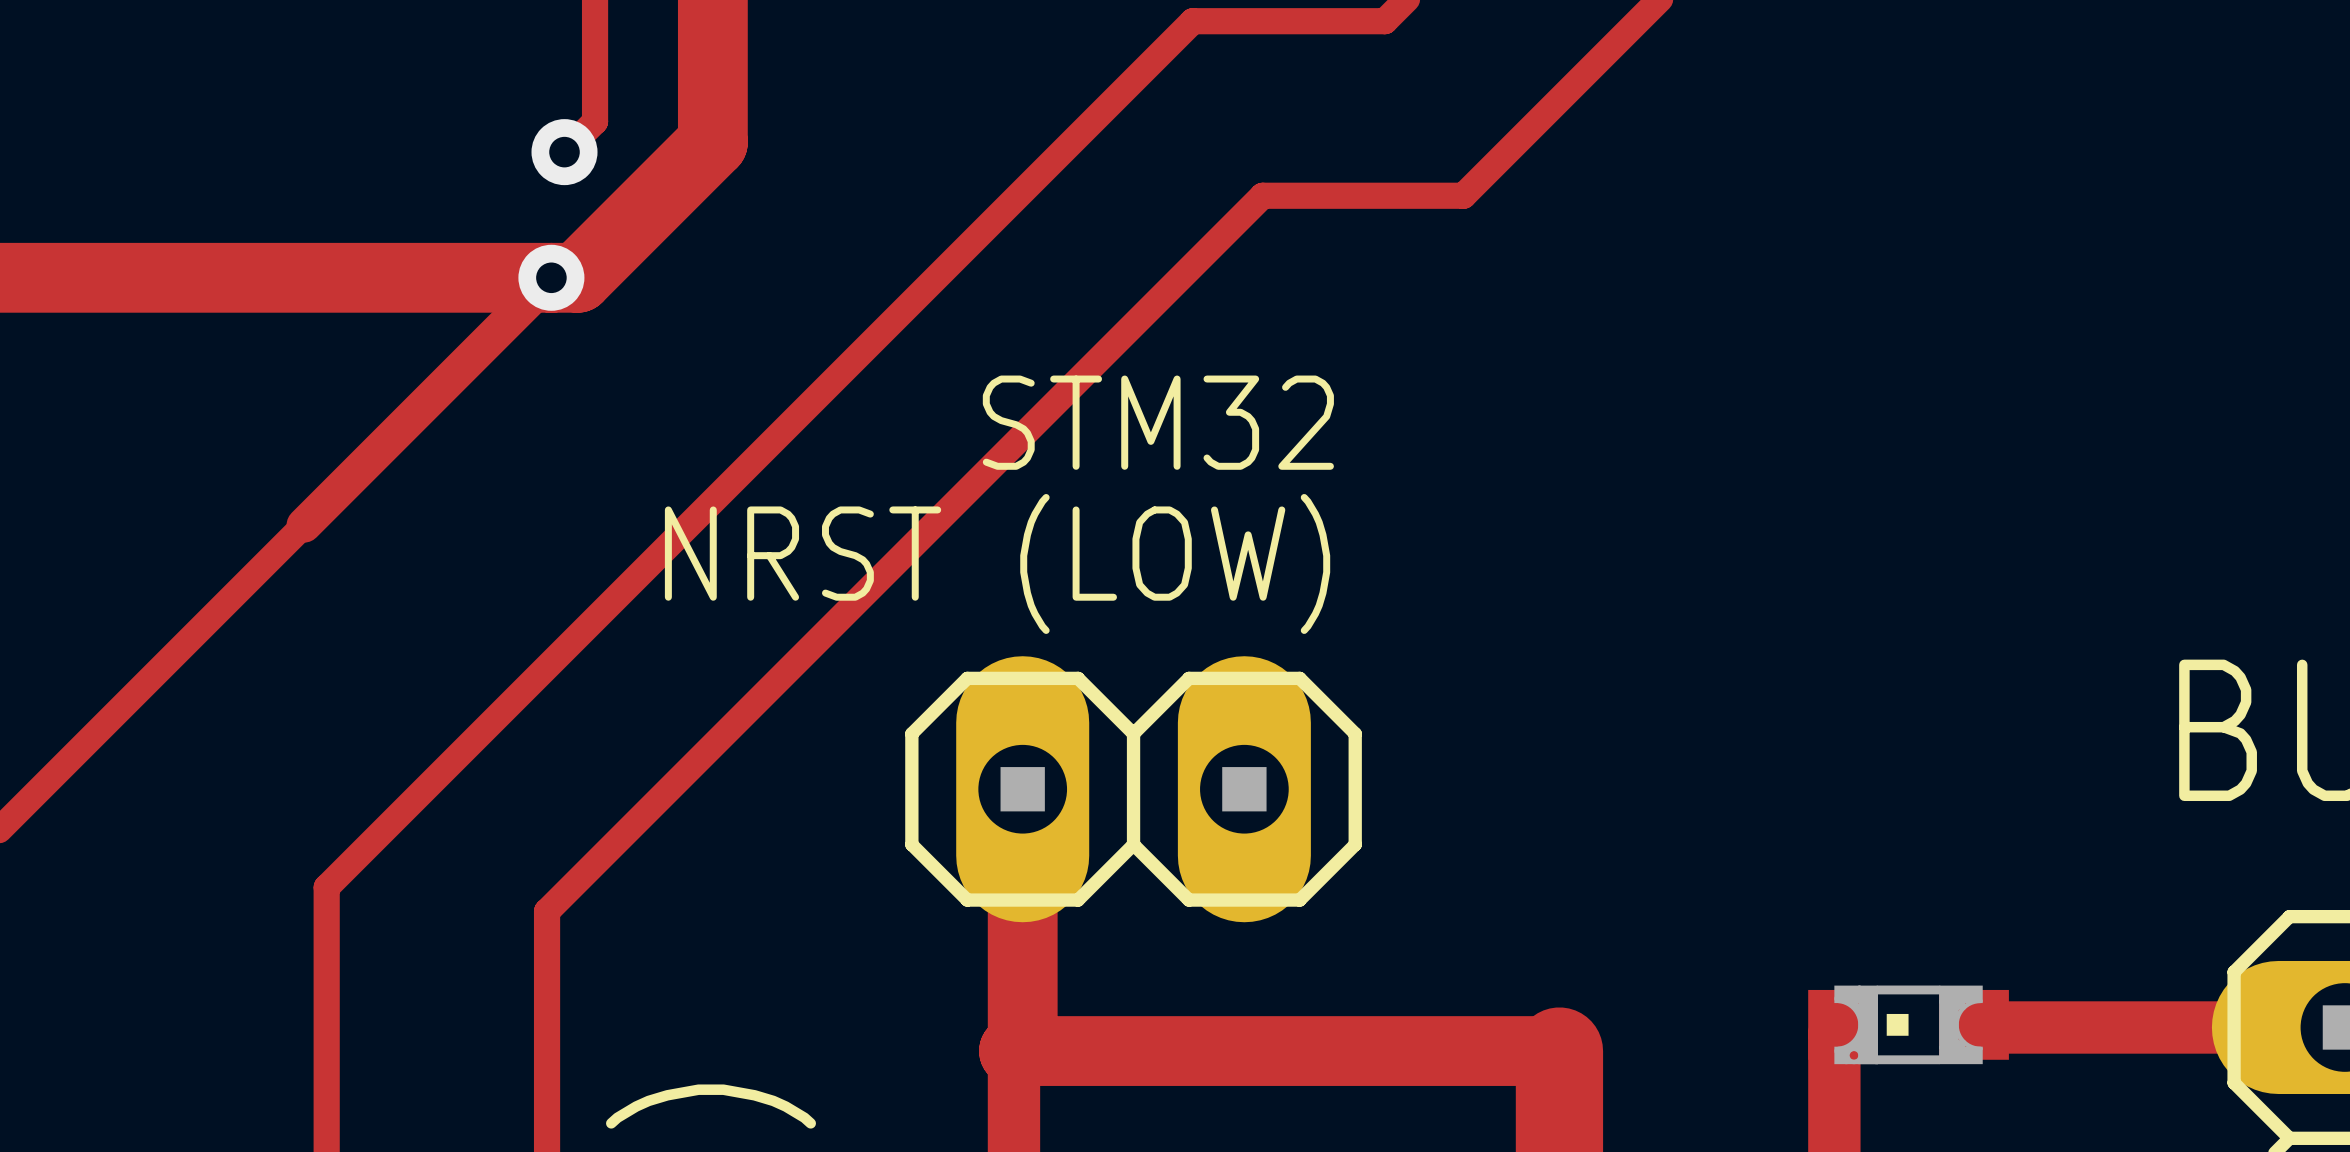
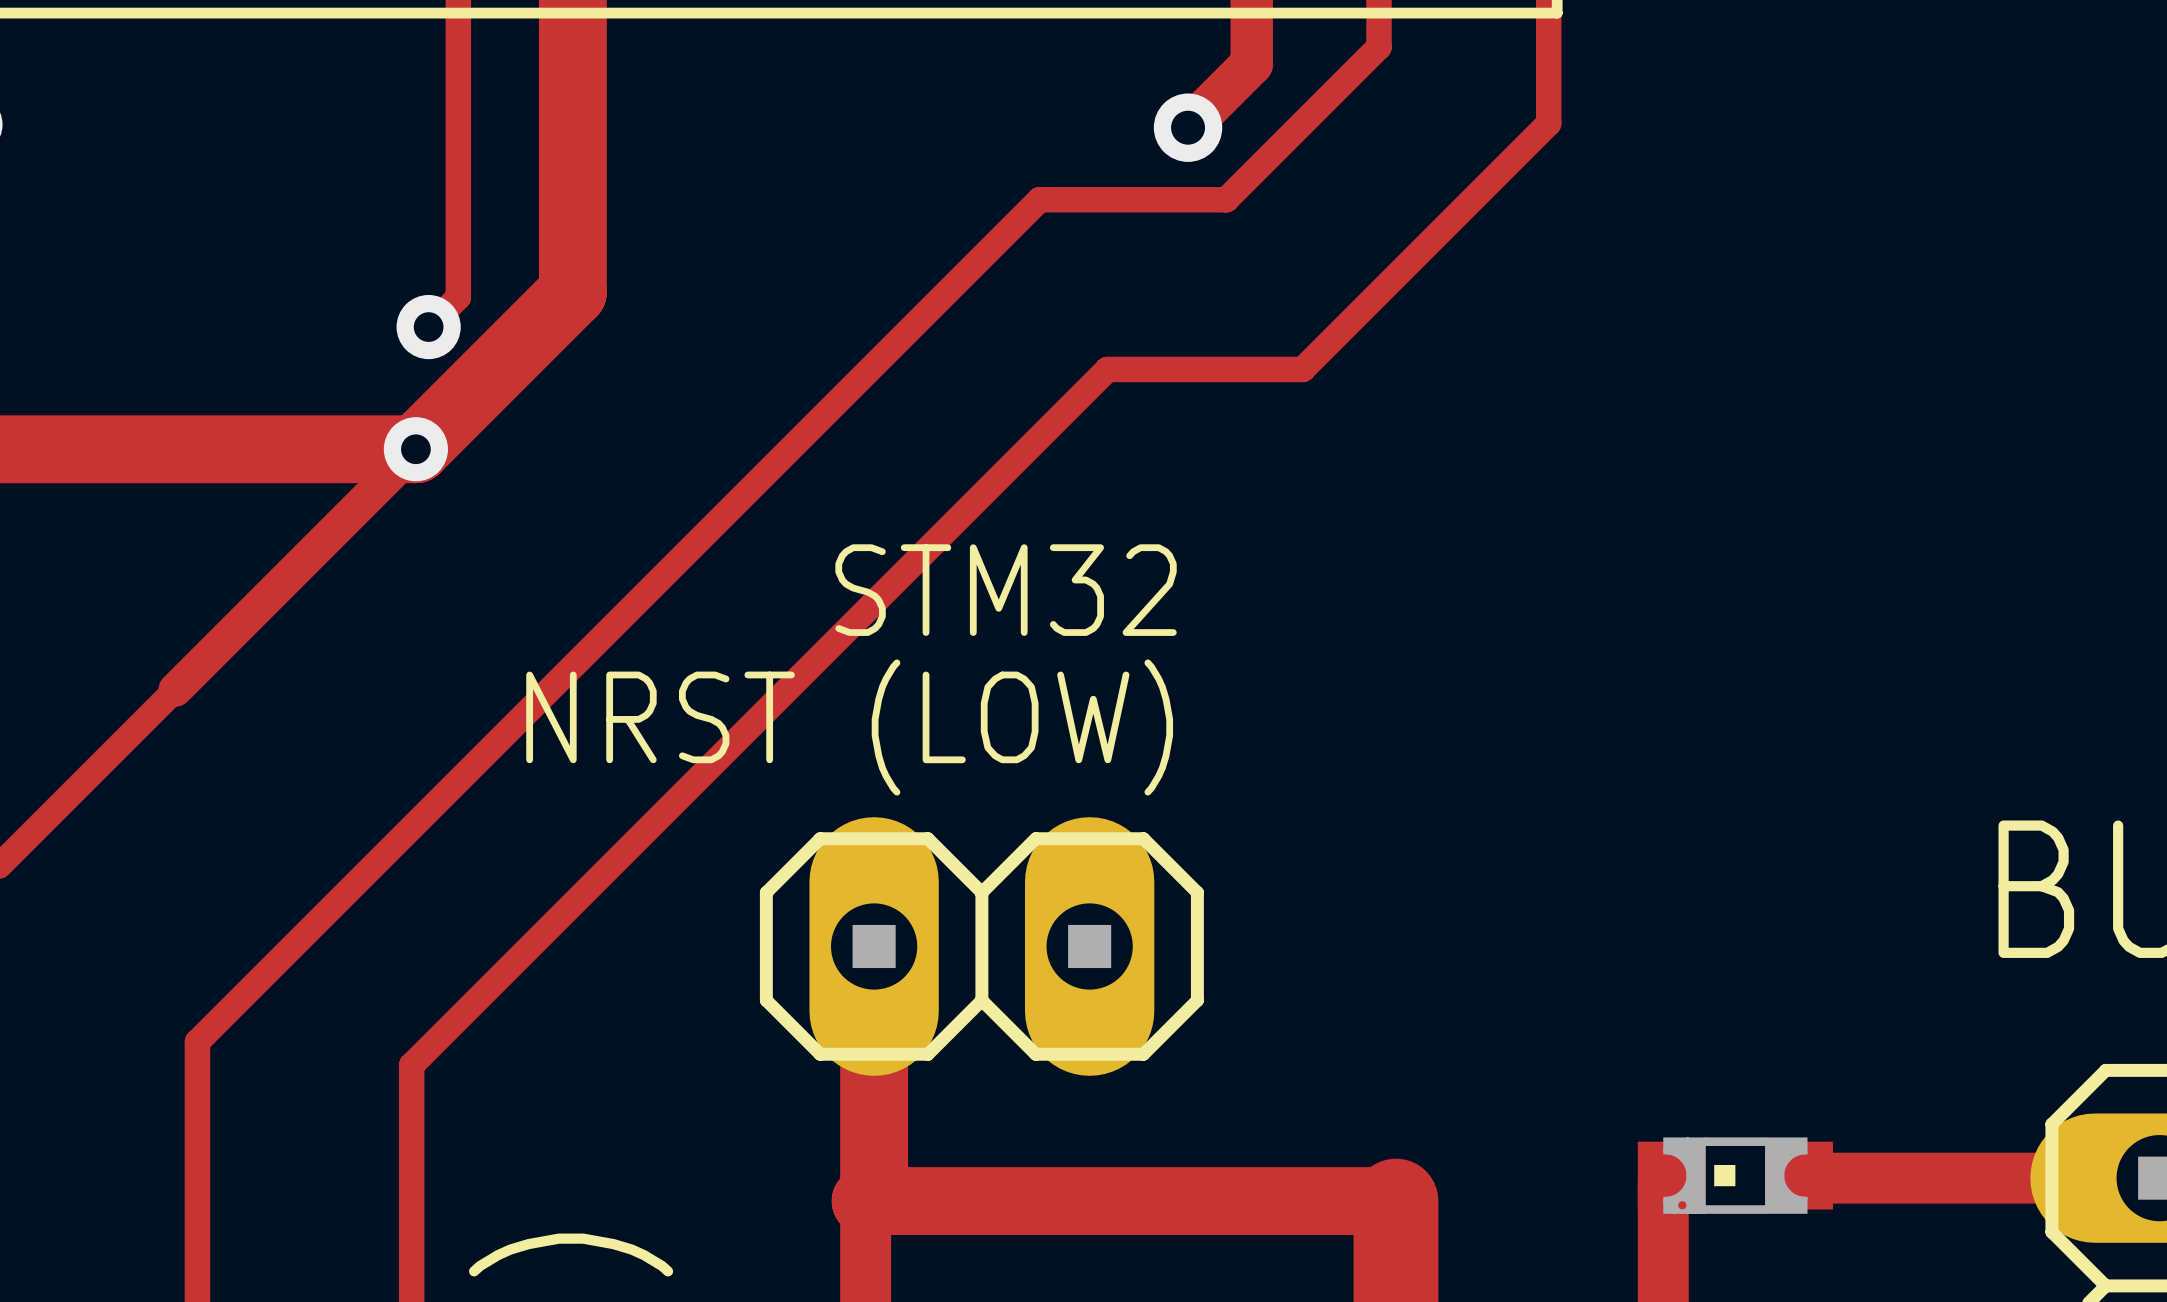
track: (712, 116) (712, 142) (577, 277) (551, 277) -> (572, 292) (415, 449)

